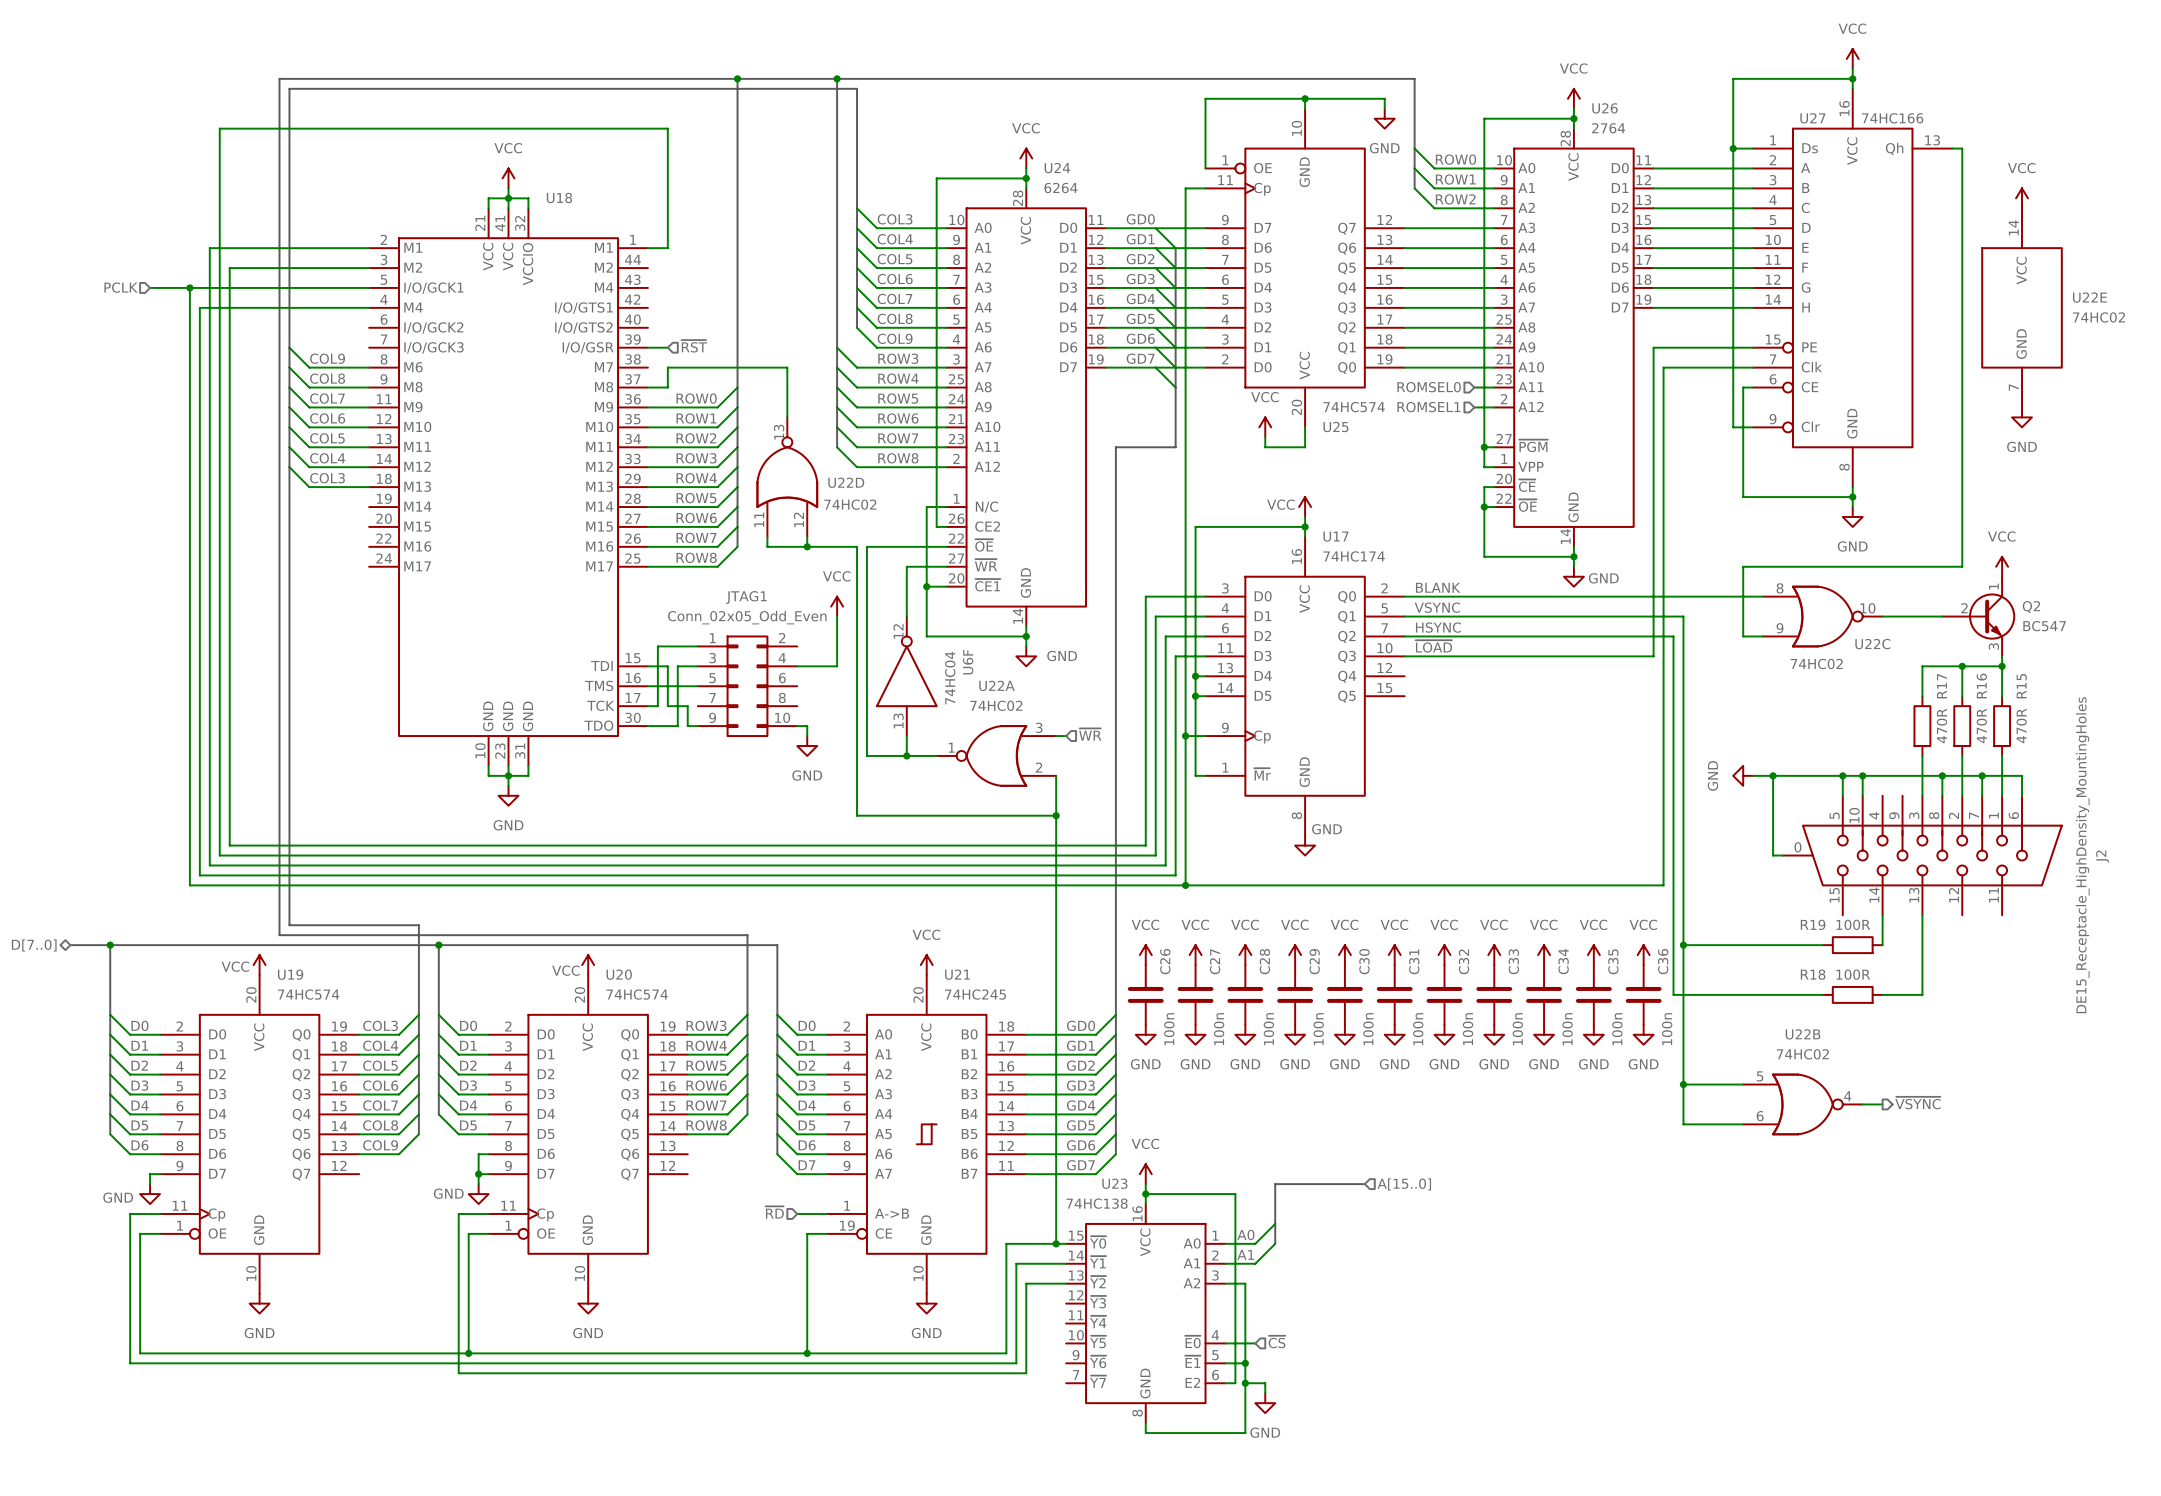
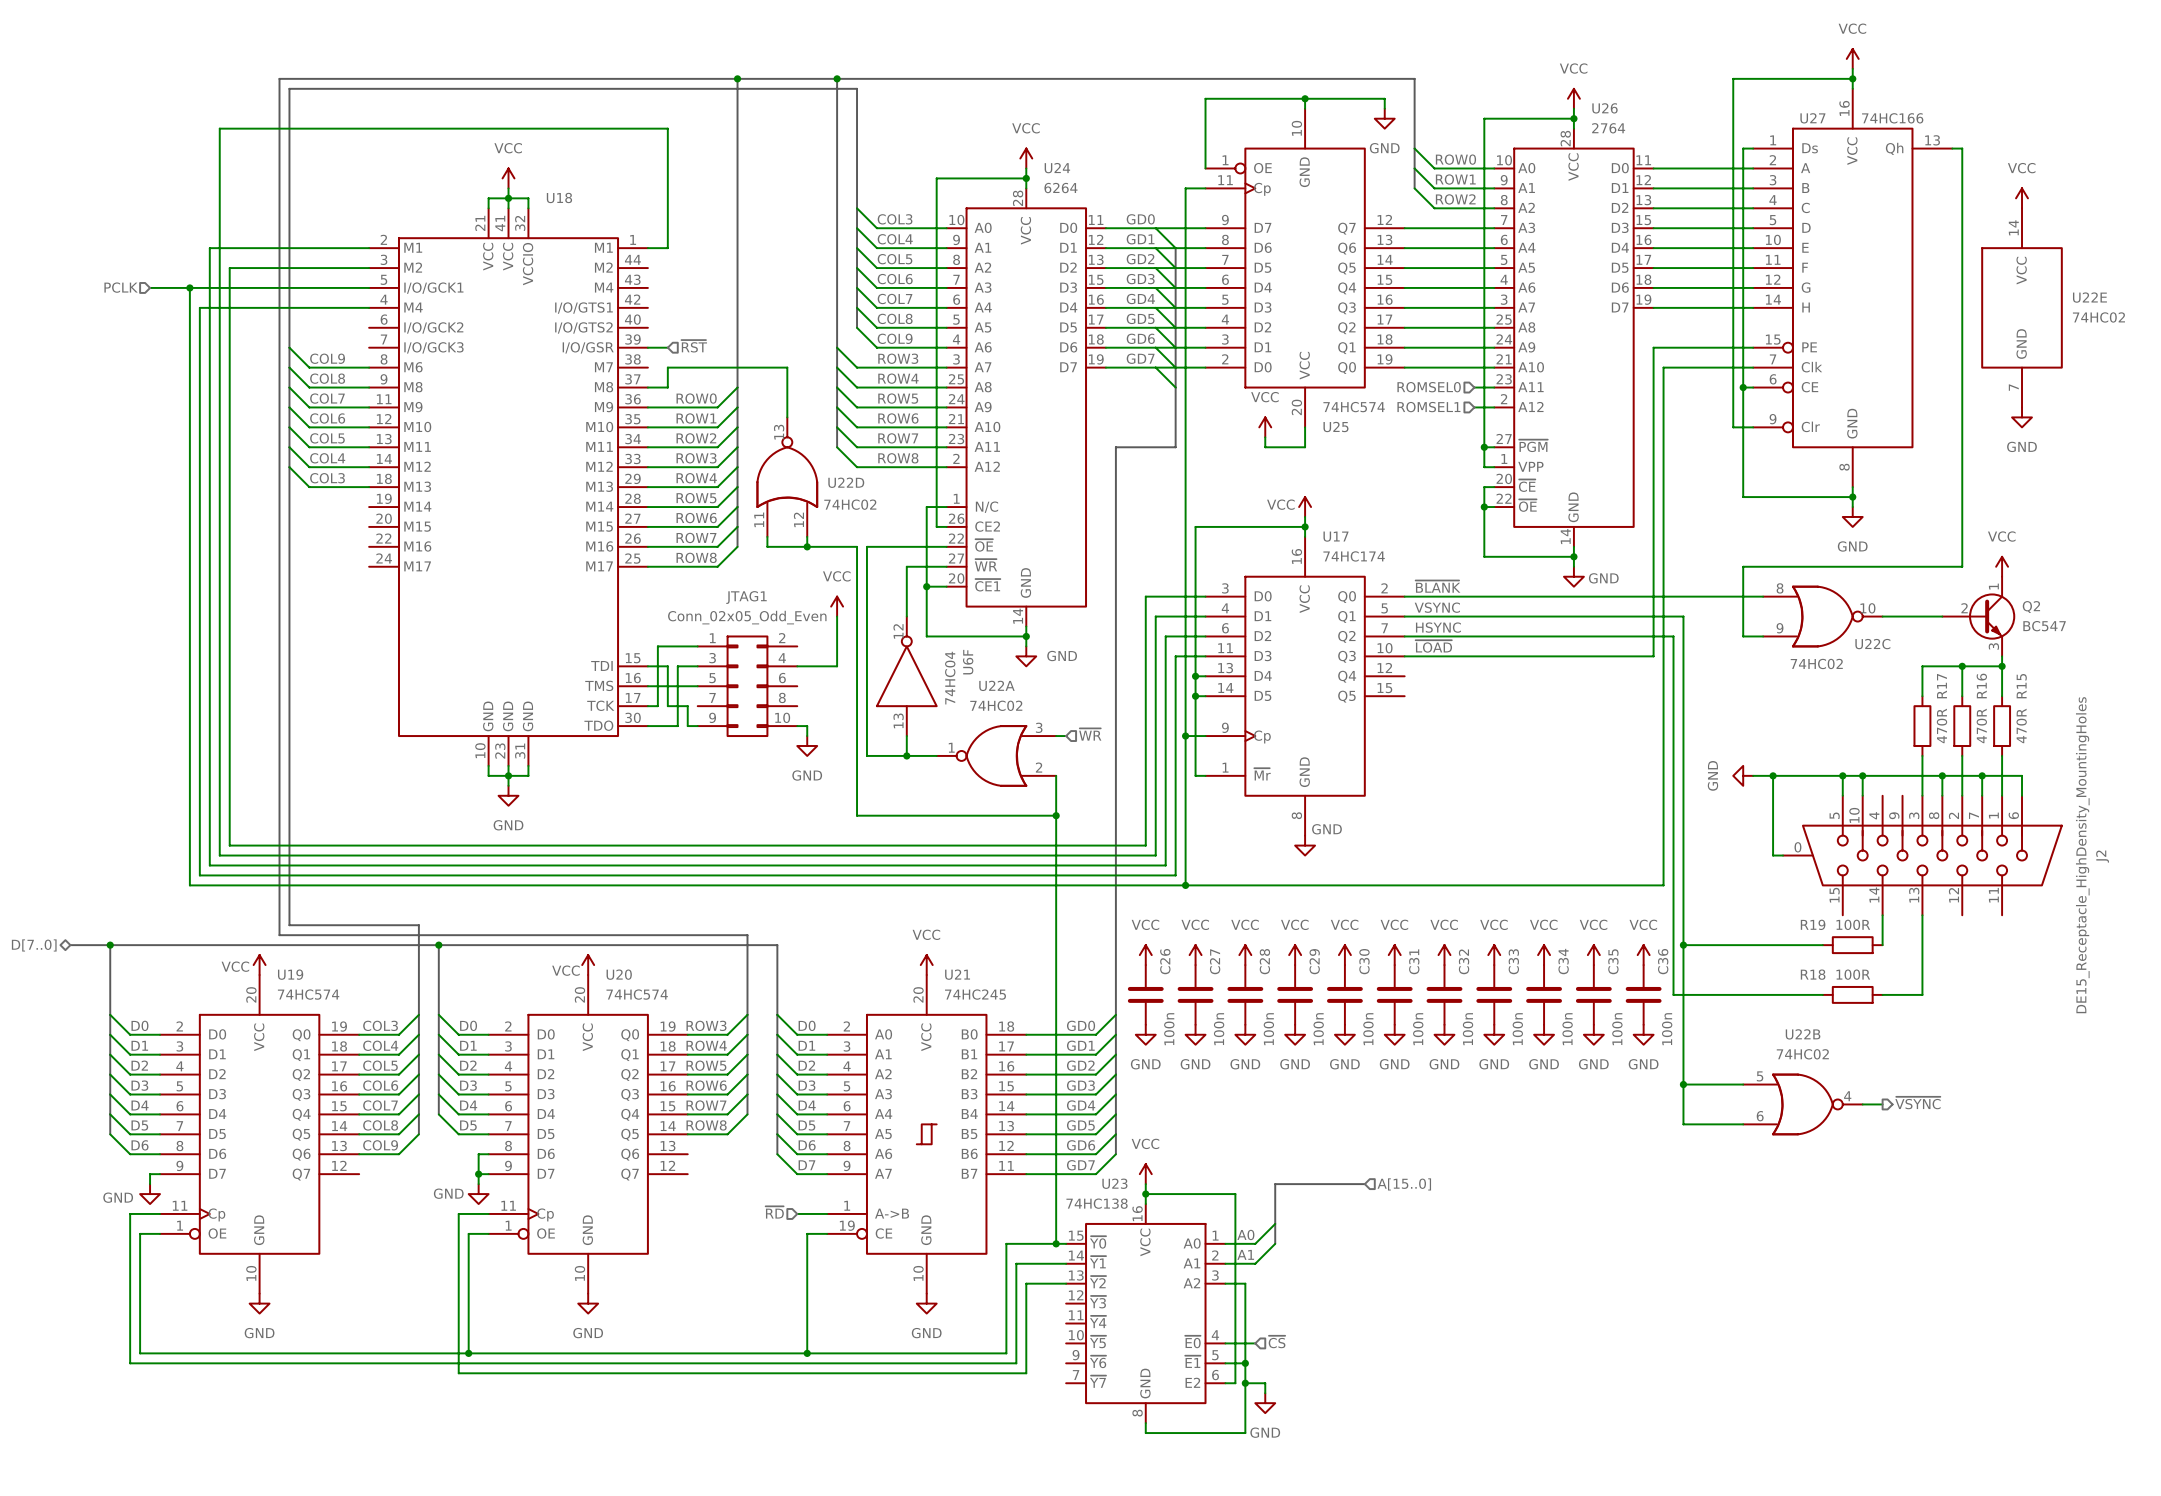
wire: (1733, 148) (1743, 148) -> (1743, 387) (1743, 148)
junction: (1733, 148) -> none
junction: none -> (1743, 387)
label: BLANK (1438, 587) -> ~{BLANK} (1438, 586)

